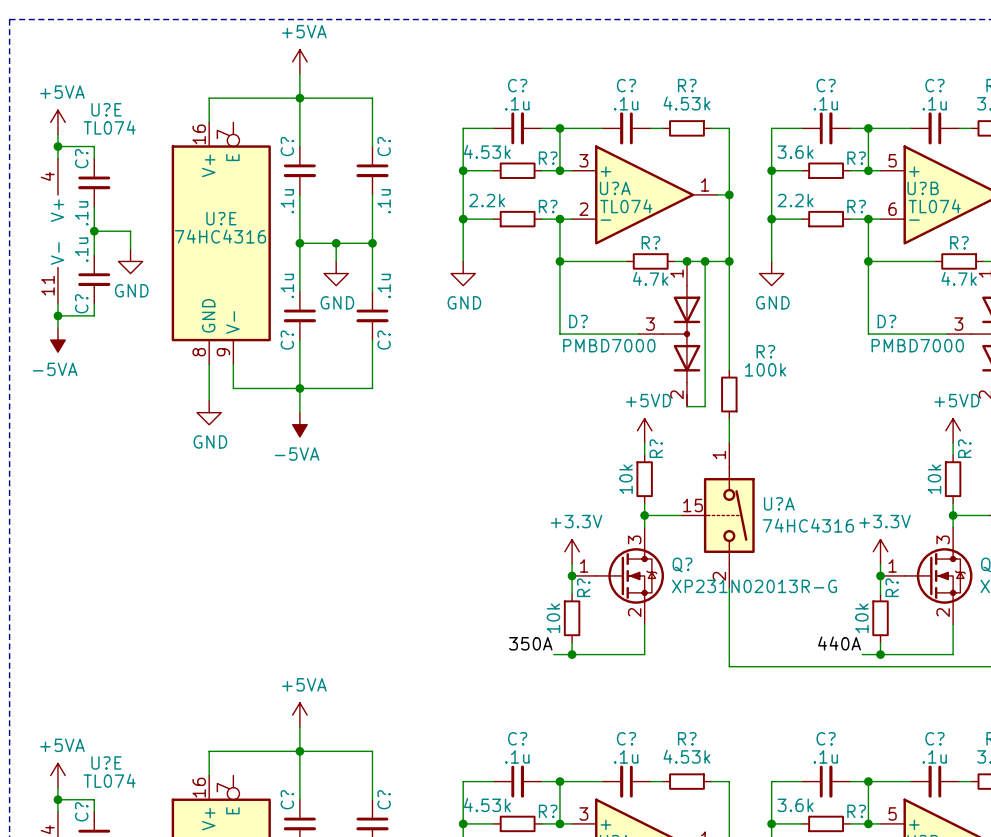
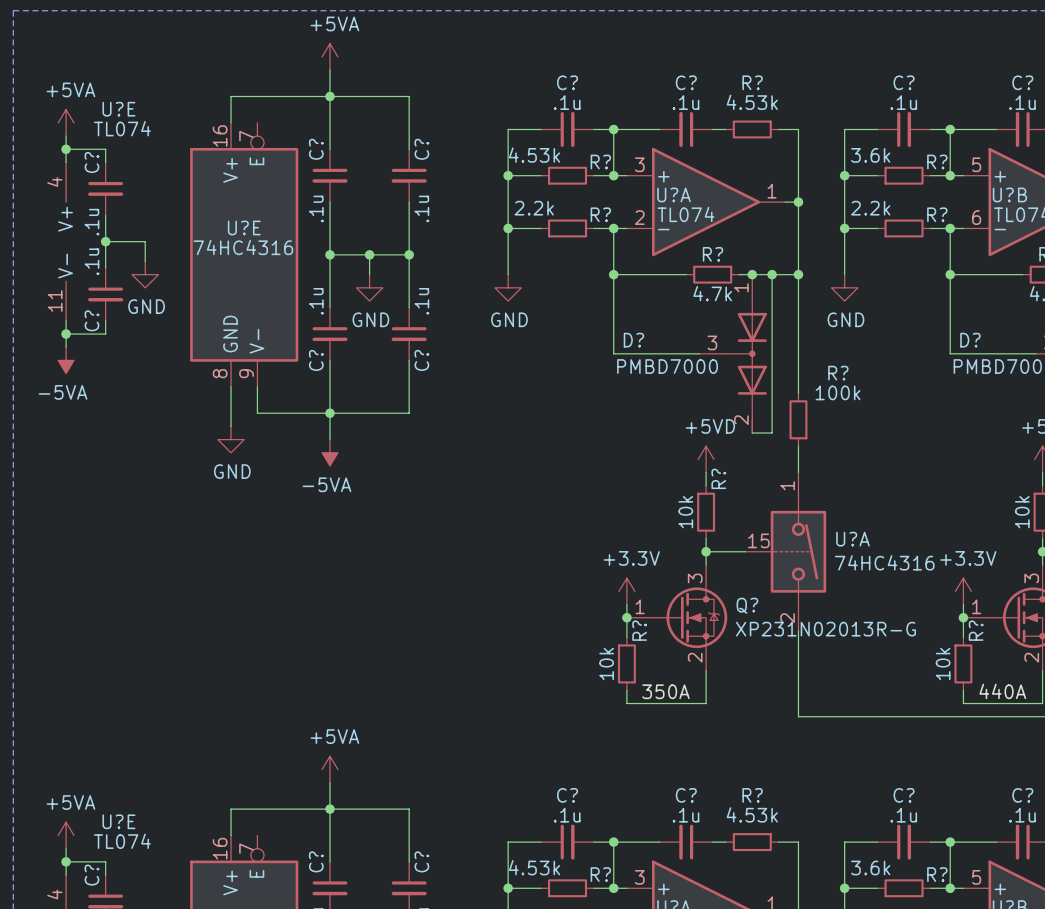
label position: 350A (530, 643) -> 350A (665, 691)
label position: 440A (839, 643) -> 440A (1002, 691)
wire: (553, 654) (572, 654) -> none
junction: (572, 654) -> none
wire: (862, 654) (880, 654) -> none
junction: (880, 654) -> none

